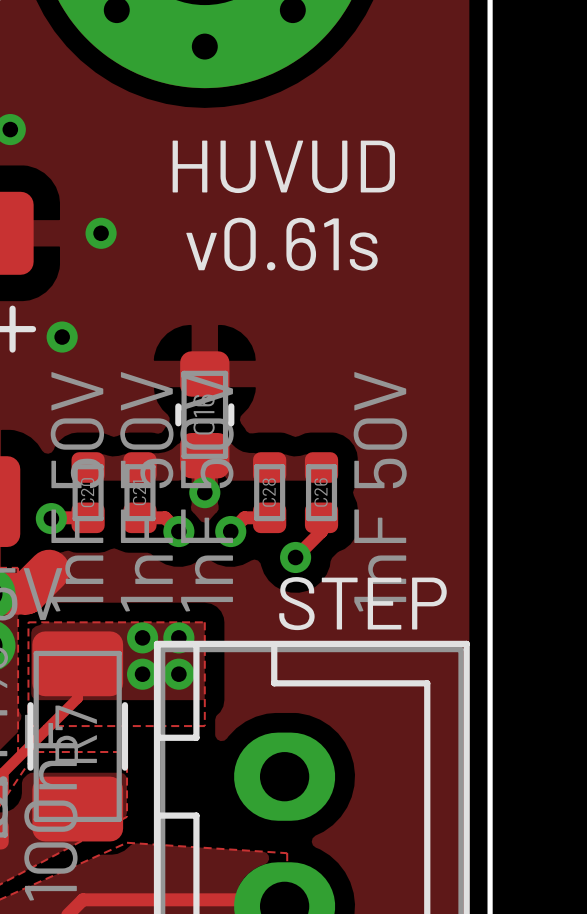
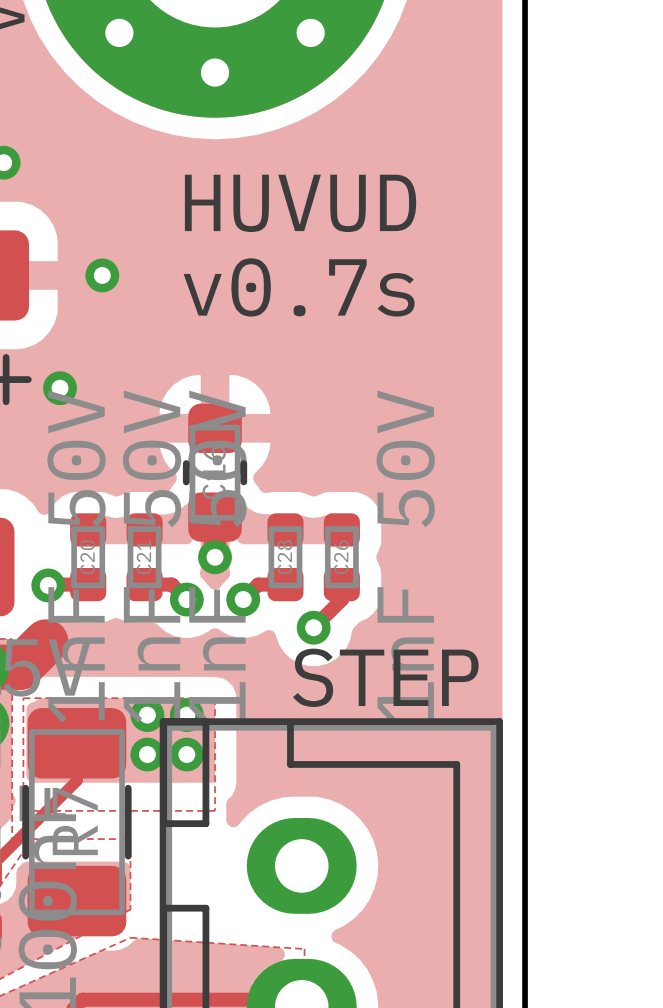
text: v0.61s (281, 244) -> v0.7s (299, 287)

